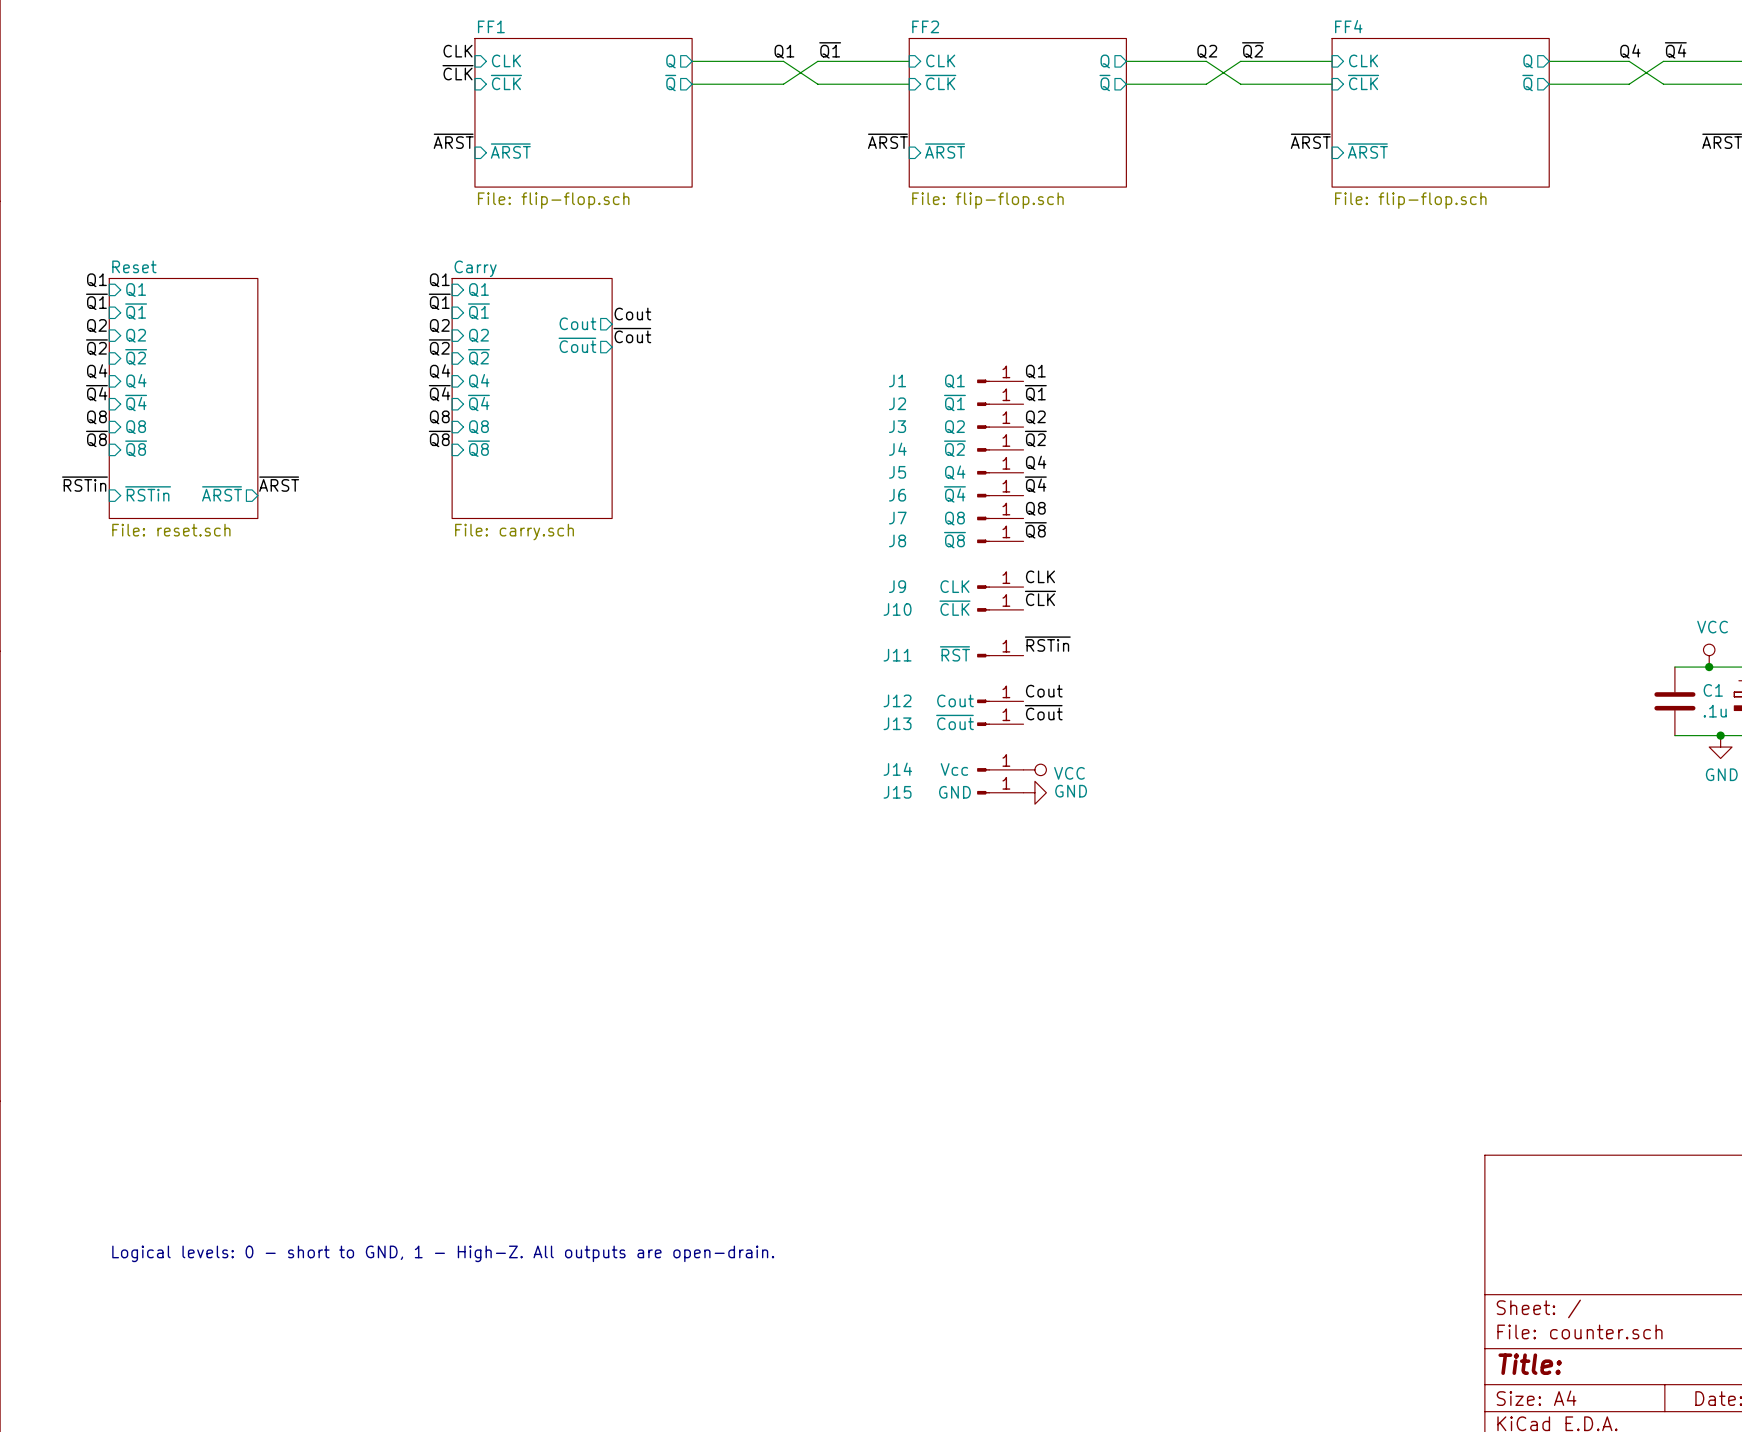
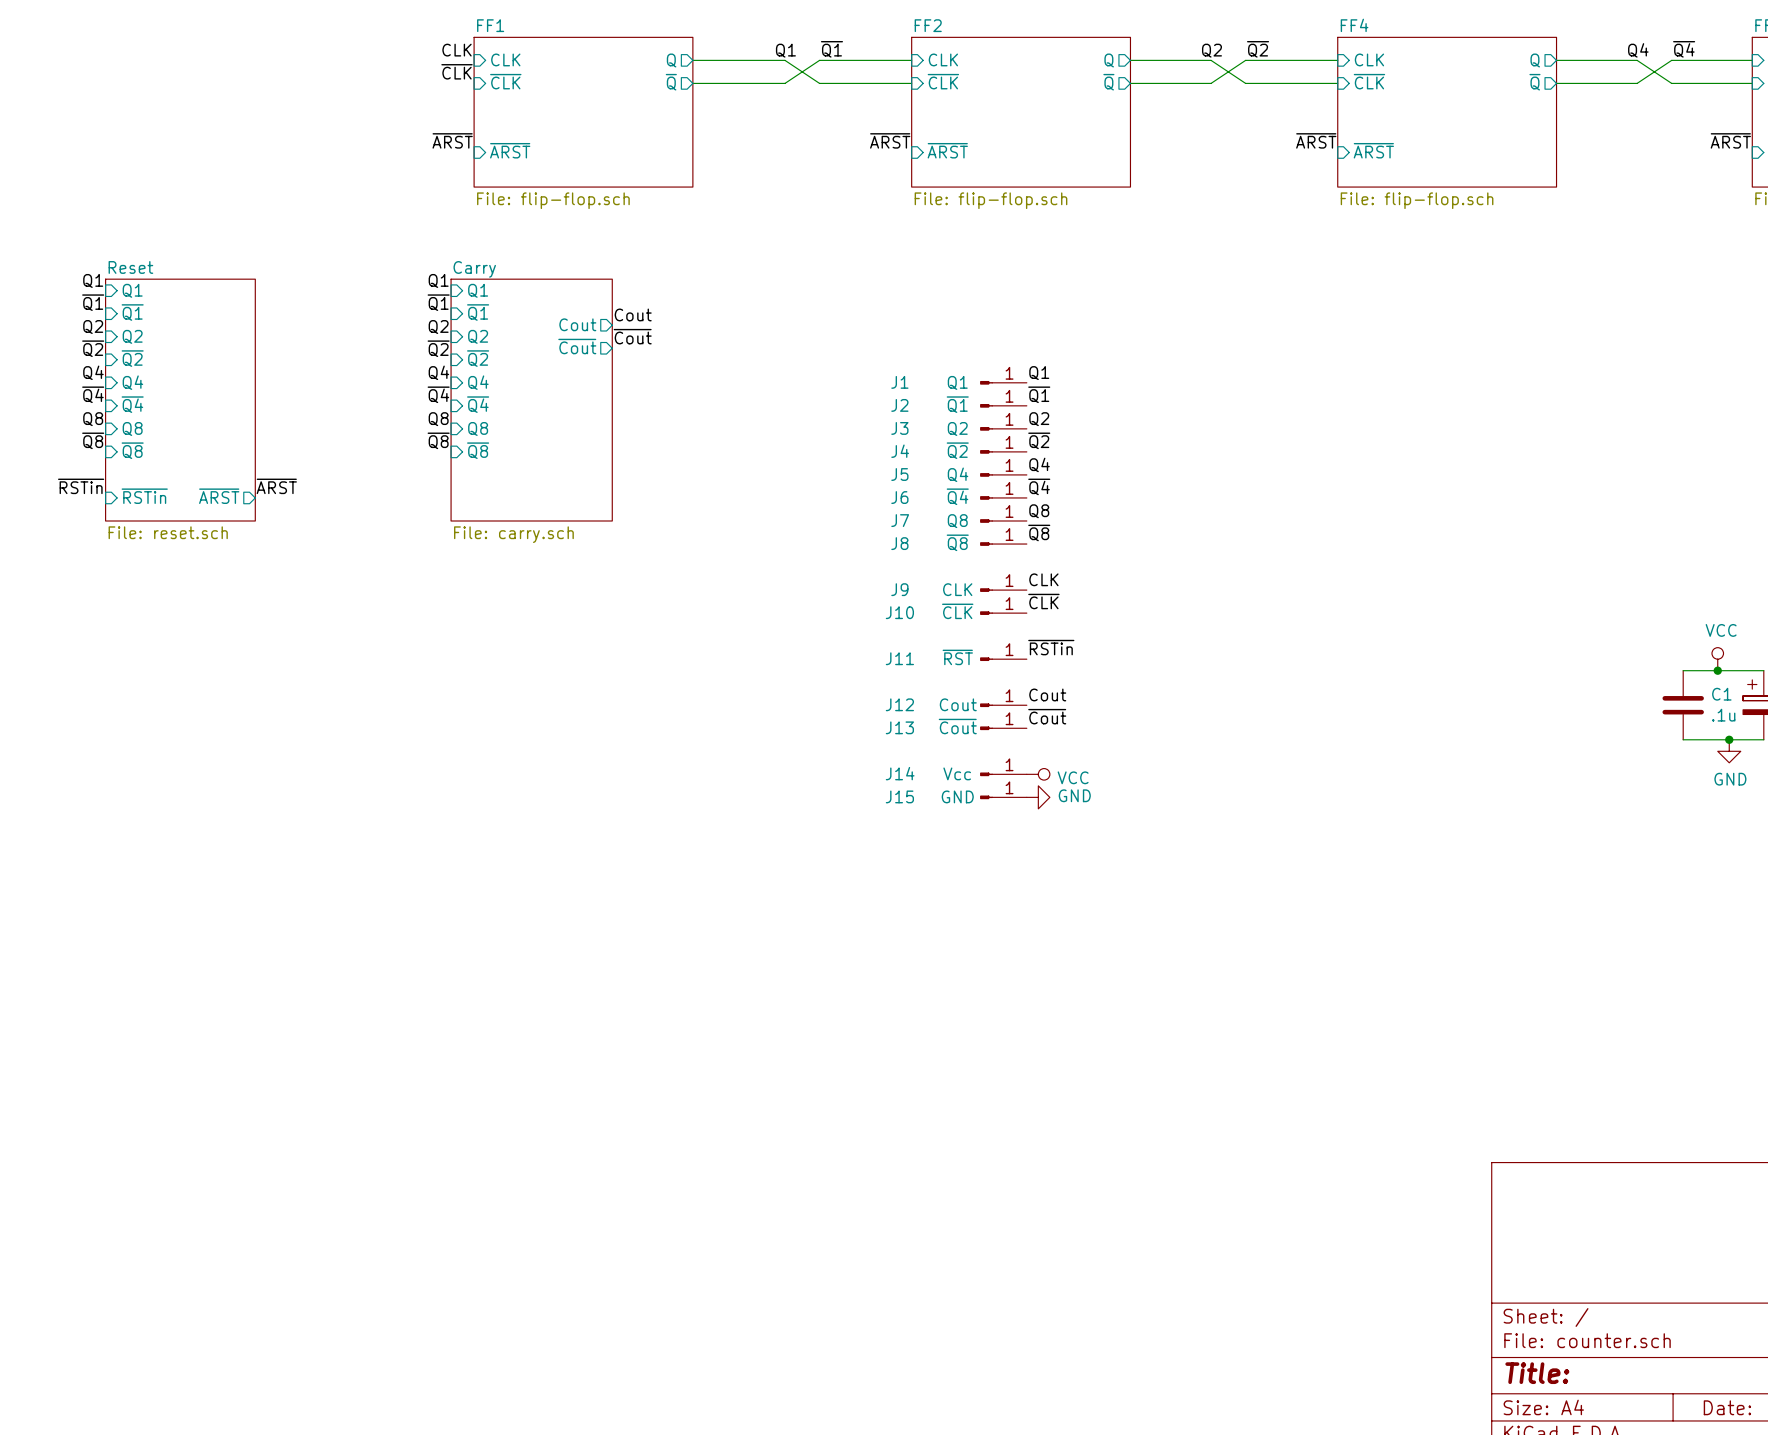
text: Logical levels: 0 - short to GND, 1 - High-Z. All outputs are open-drain. (443, 1253) -> none

